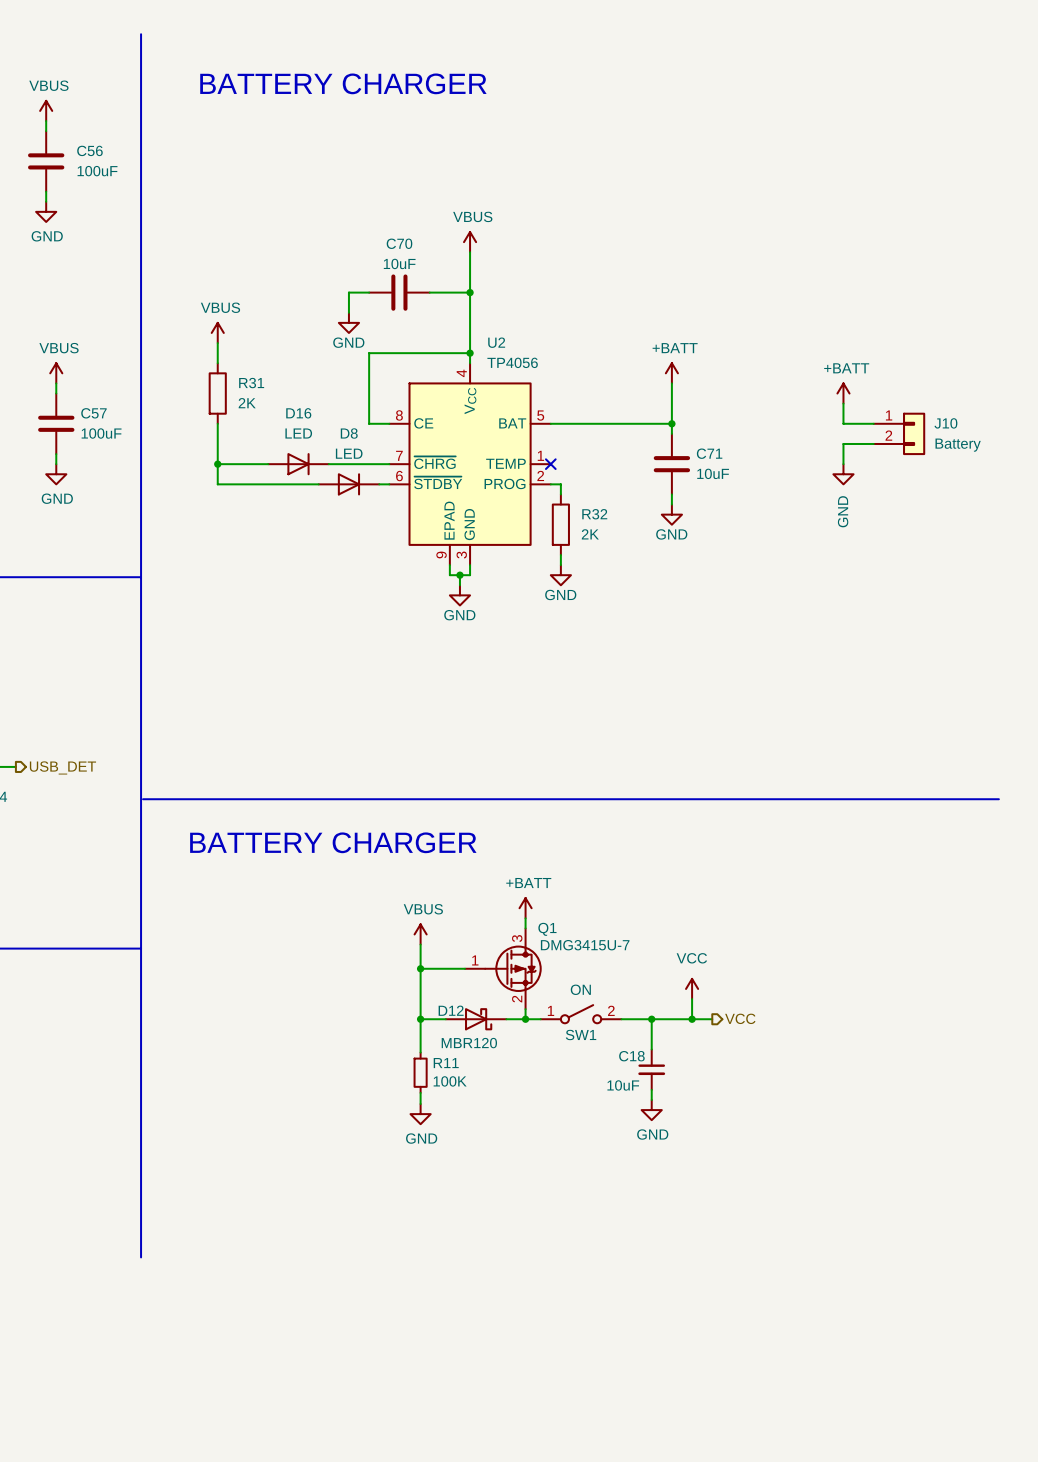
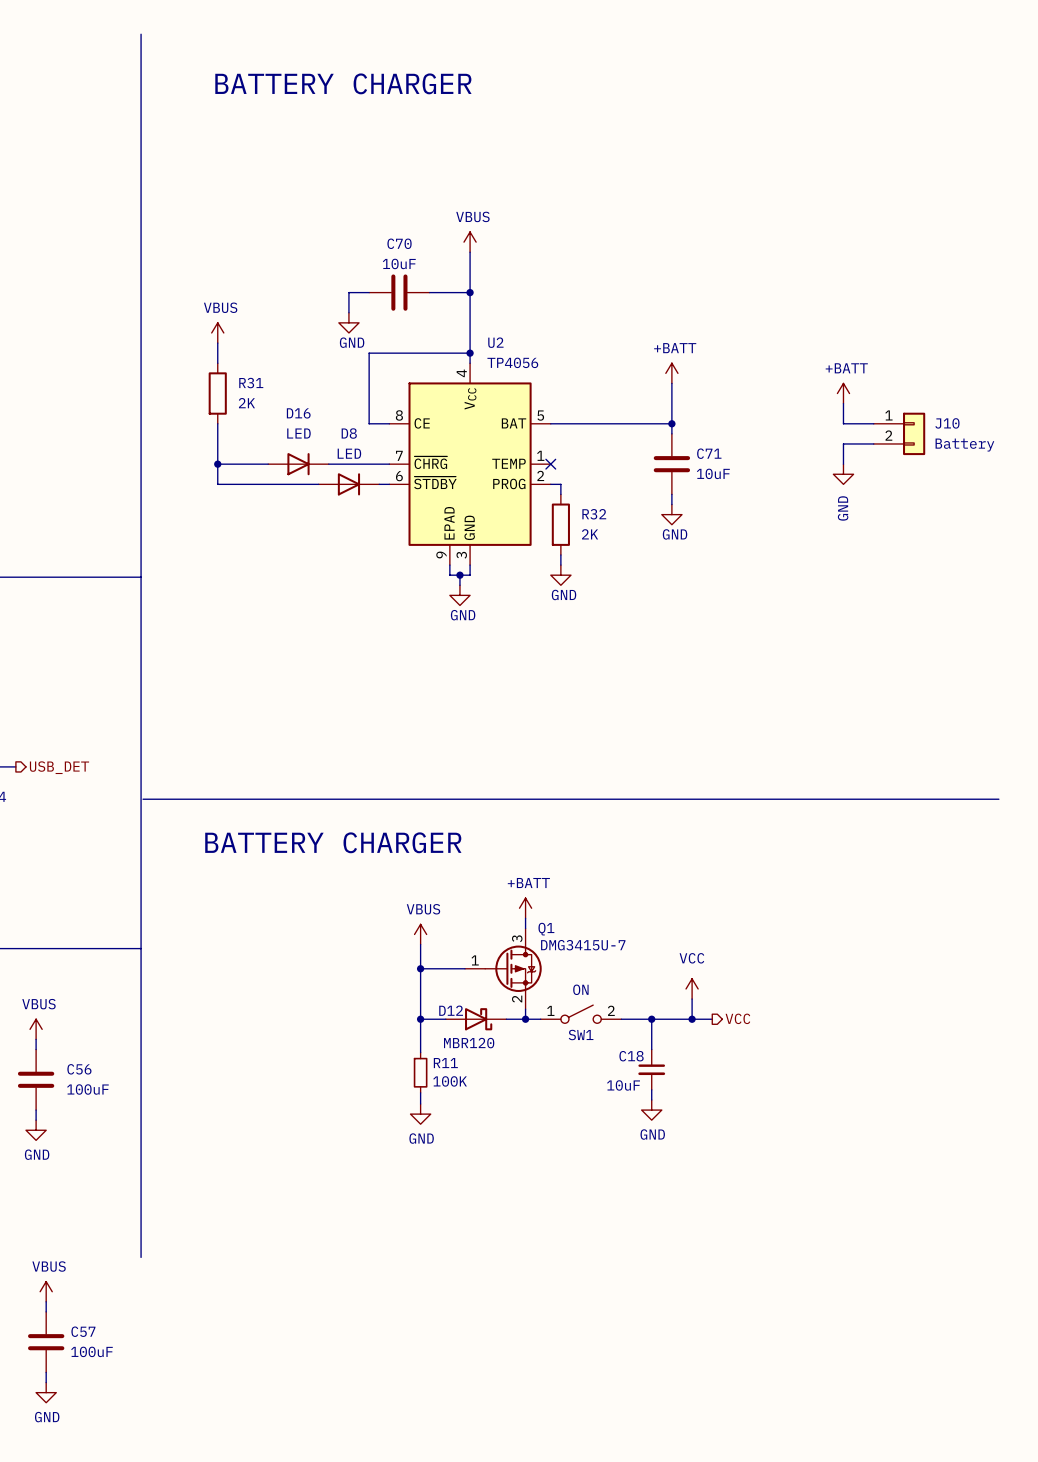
power symbol: VBUS (46, 110) -> none
wire: (46, 121) (46, 131) -> none
C56 position: (46, 161) -> (36, 1079)
wire: (46, 191) (46, 201) -> none
power symbol: GND (46, 211) -> none
power symbol: VBUS (56, 373) -> none
wire: (56, 383) (56, 393) -> none
C57 position: (56, 423) -> (46, 1342)
wire: (56, 454) (56, 464) -> none
power symbol: GND (56, 474) -> none
power symbol: none -> VBUS (36, 1029)
wire: none -> (36, 1039) (36, 1049)
wire: none -> (36, 1110) (36, 1120)
power symbol: none -> GND (36, 1130)
power symbol: none -> VBUS (46, 1291)
wire: none -> (46, 1301) (46, 1311)
wire: none -> (46, 1372) (46, 1382)
power symbol: none -> GND (46, 1392)

